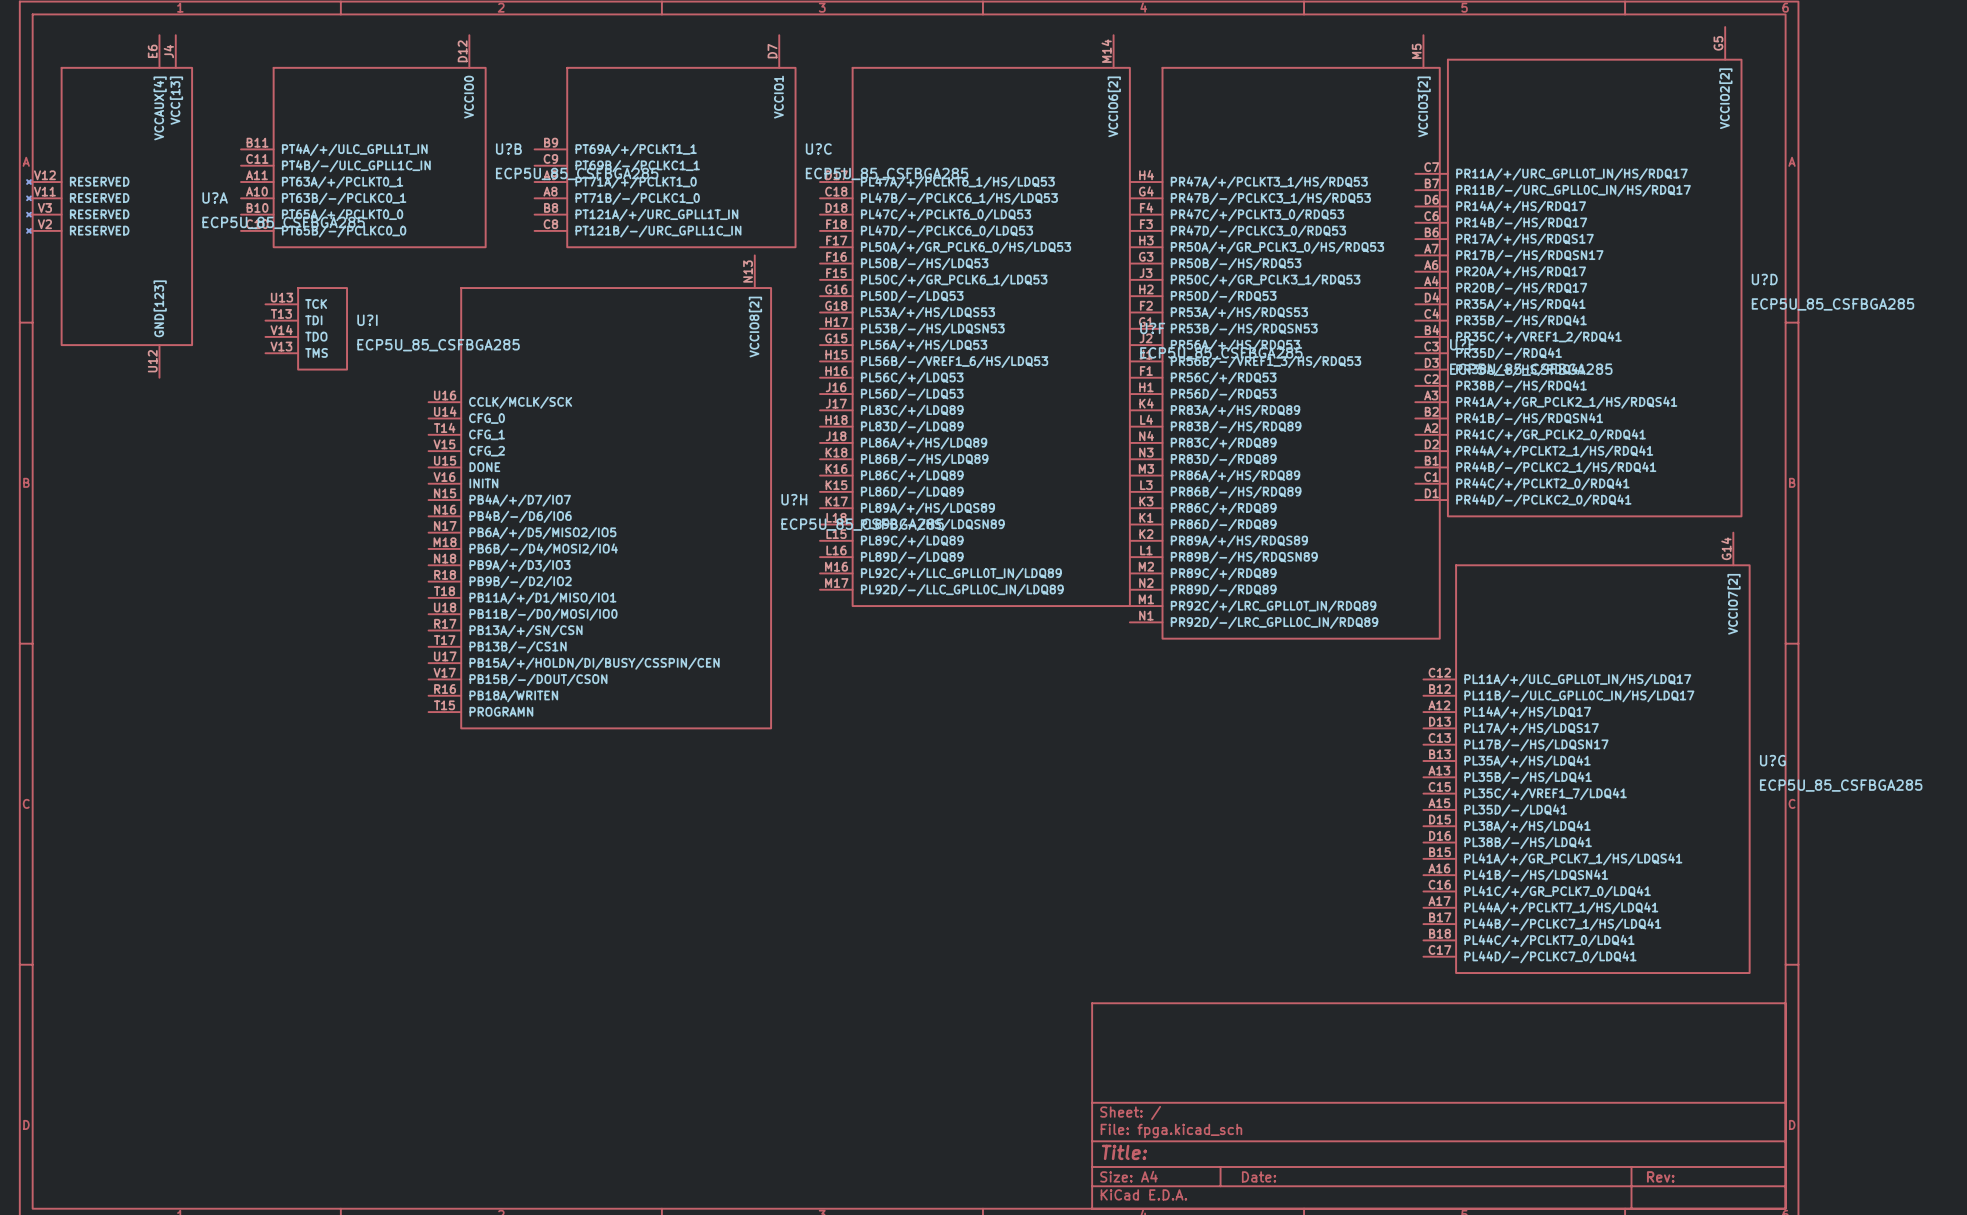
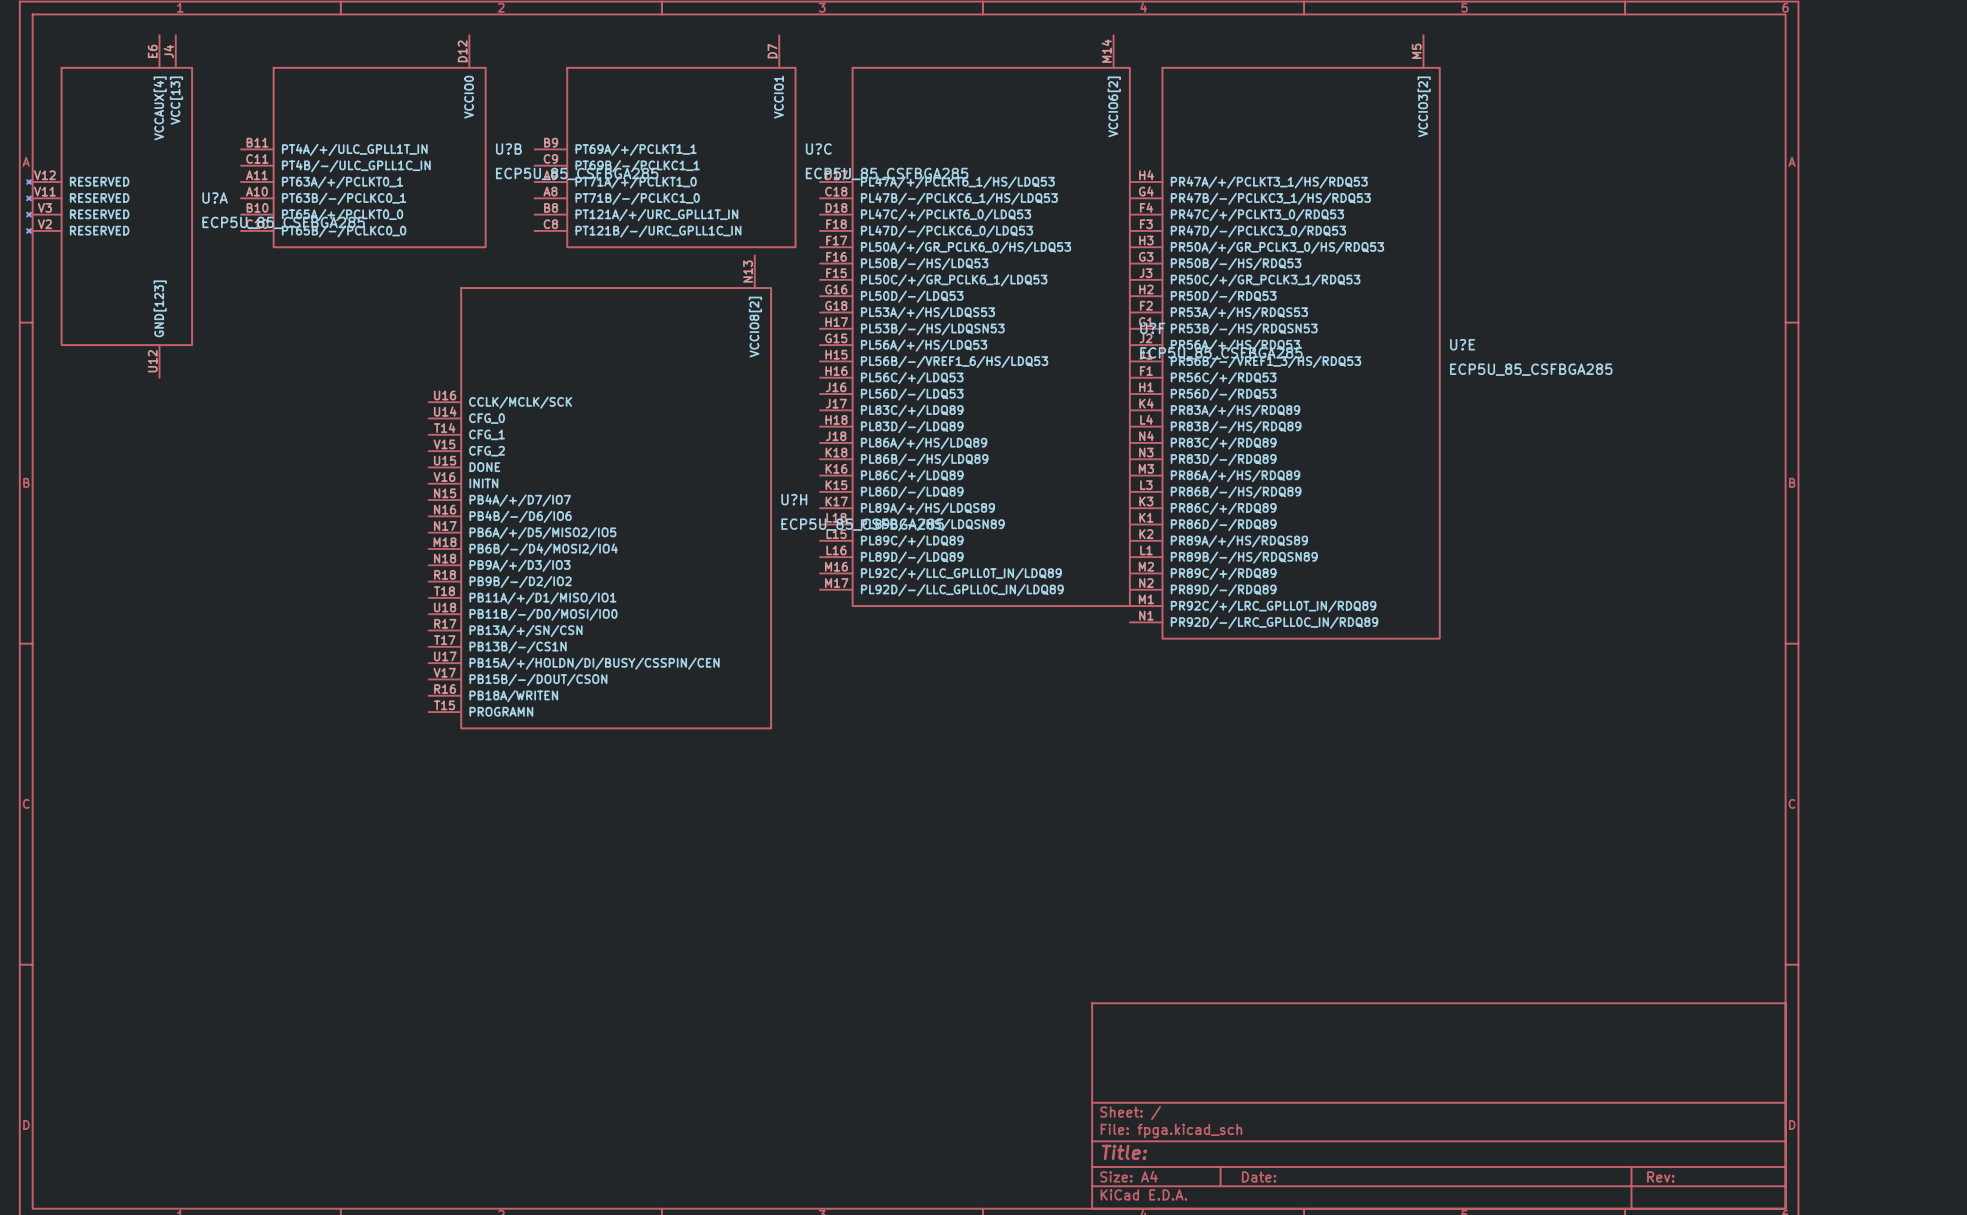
U?D: ECP5U_85_CSFBGA285 (1578, 272) -> none
U?I: ECP5U_85_CSFBGA285 (306, 328) -> none
U?G: ECP5U_85_CSFBGA285 (1587, 753) -> none

